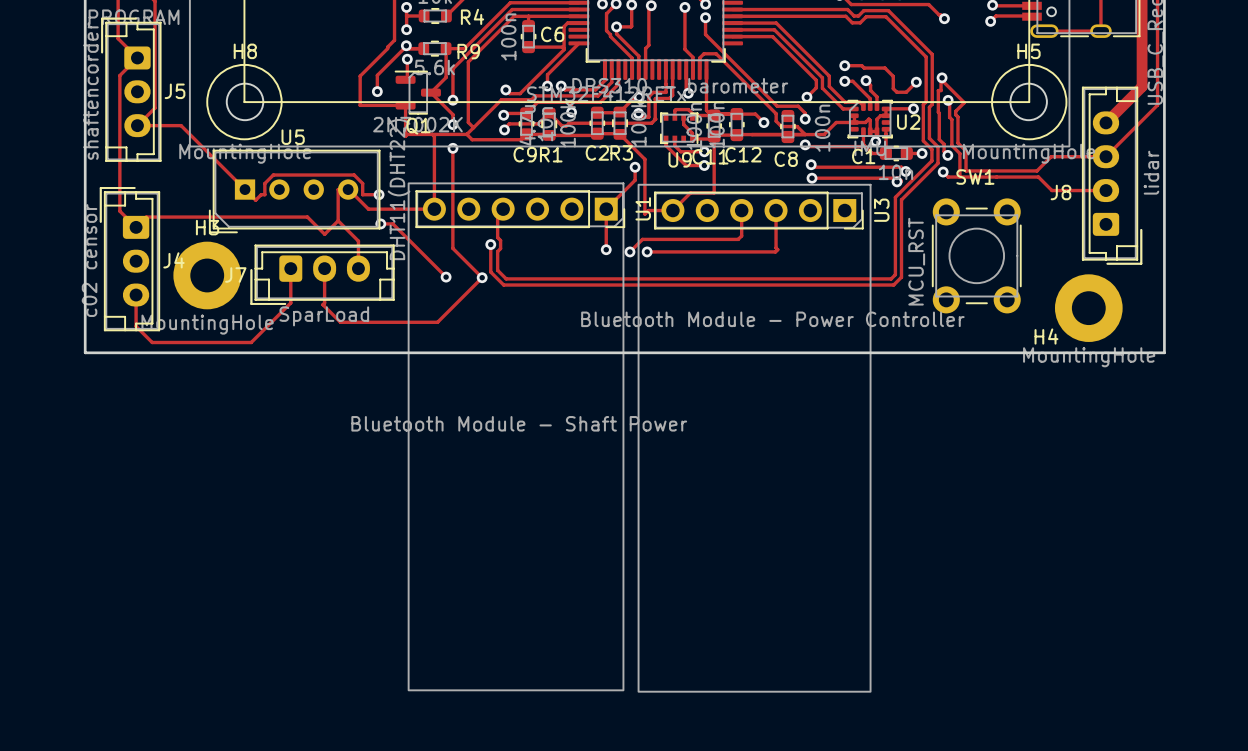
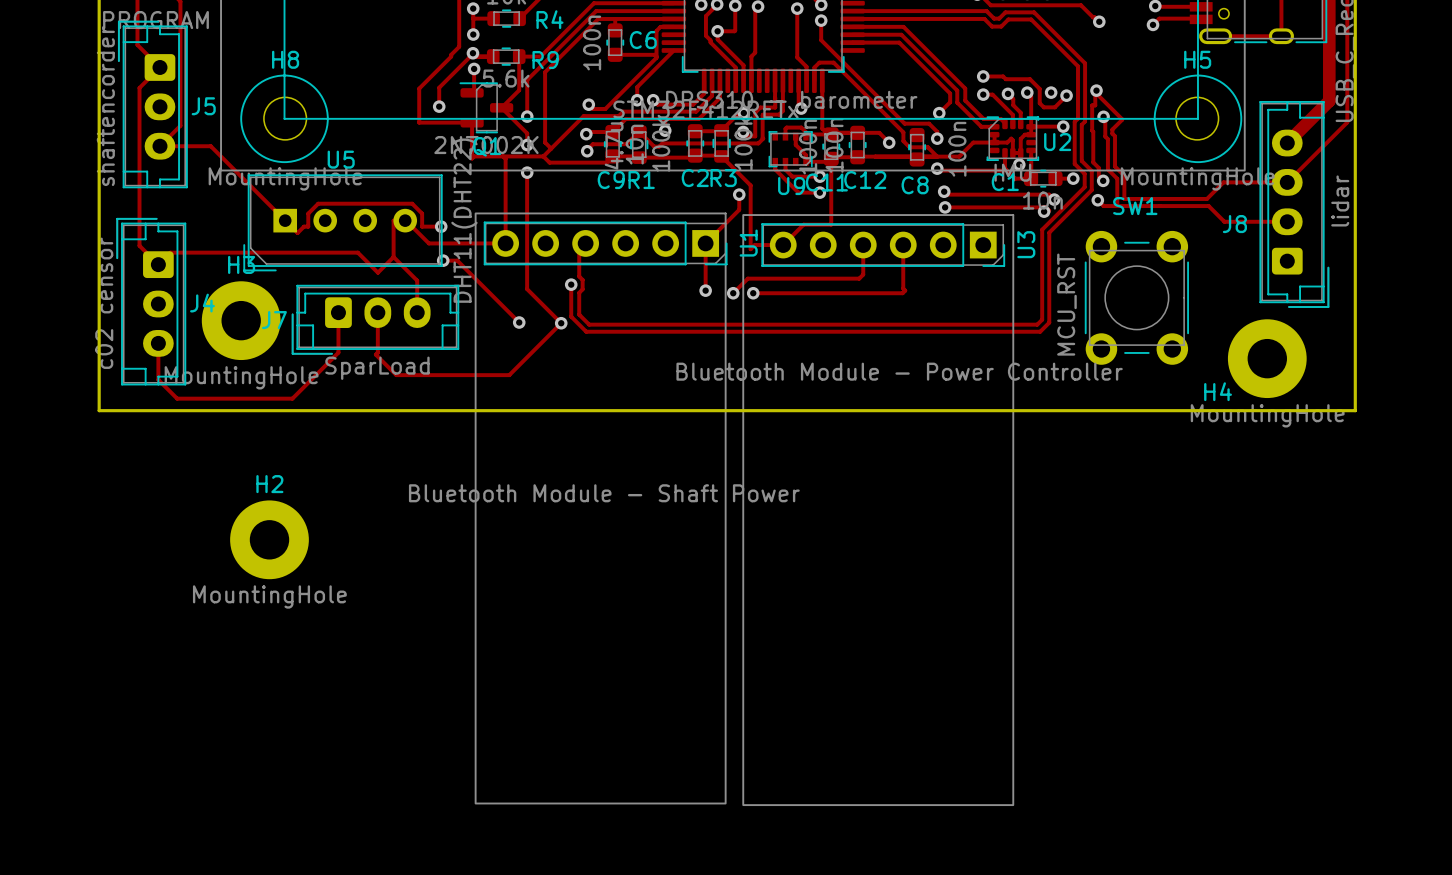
track: none -> (1027, 92) (1031, 96) (1031, 126)
via: none -> (1027, 92)
via: none -> (1051, 92)
H2: none -> MountingHole (269, 539)

